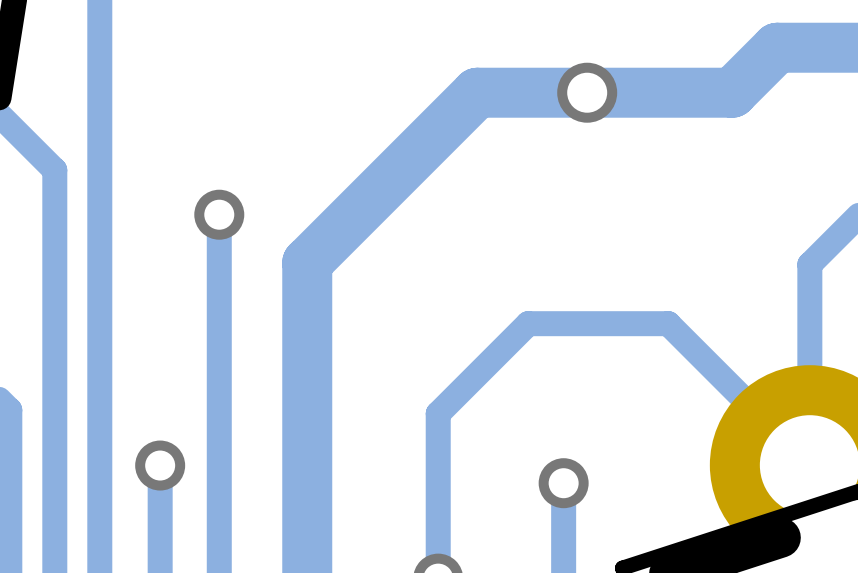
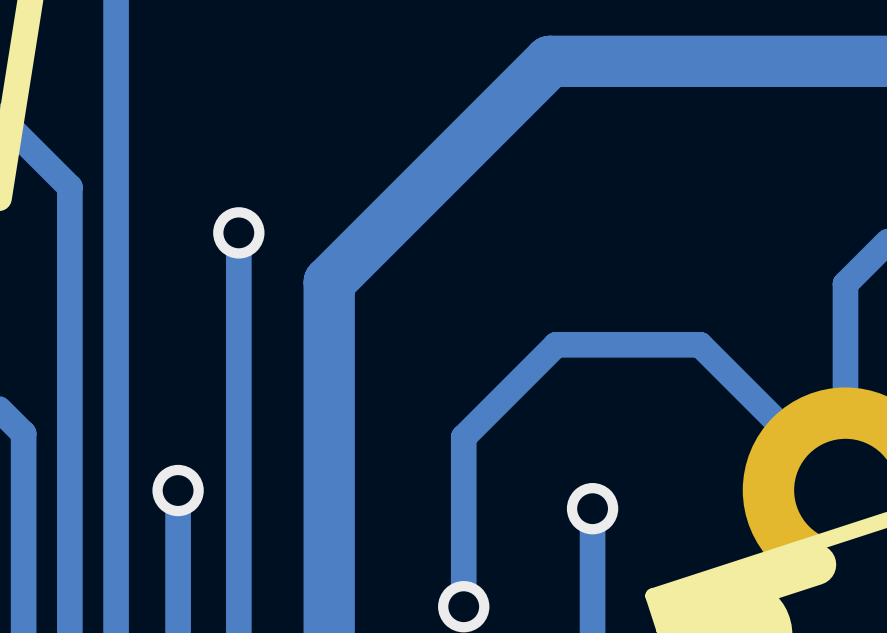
track: (777, 47) (732, 92) (477, 92) -> (811, 61) (550, 61) (503, 107)
via: (587, 92) -> none

